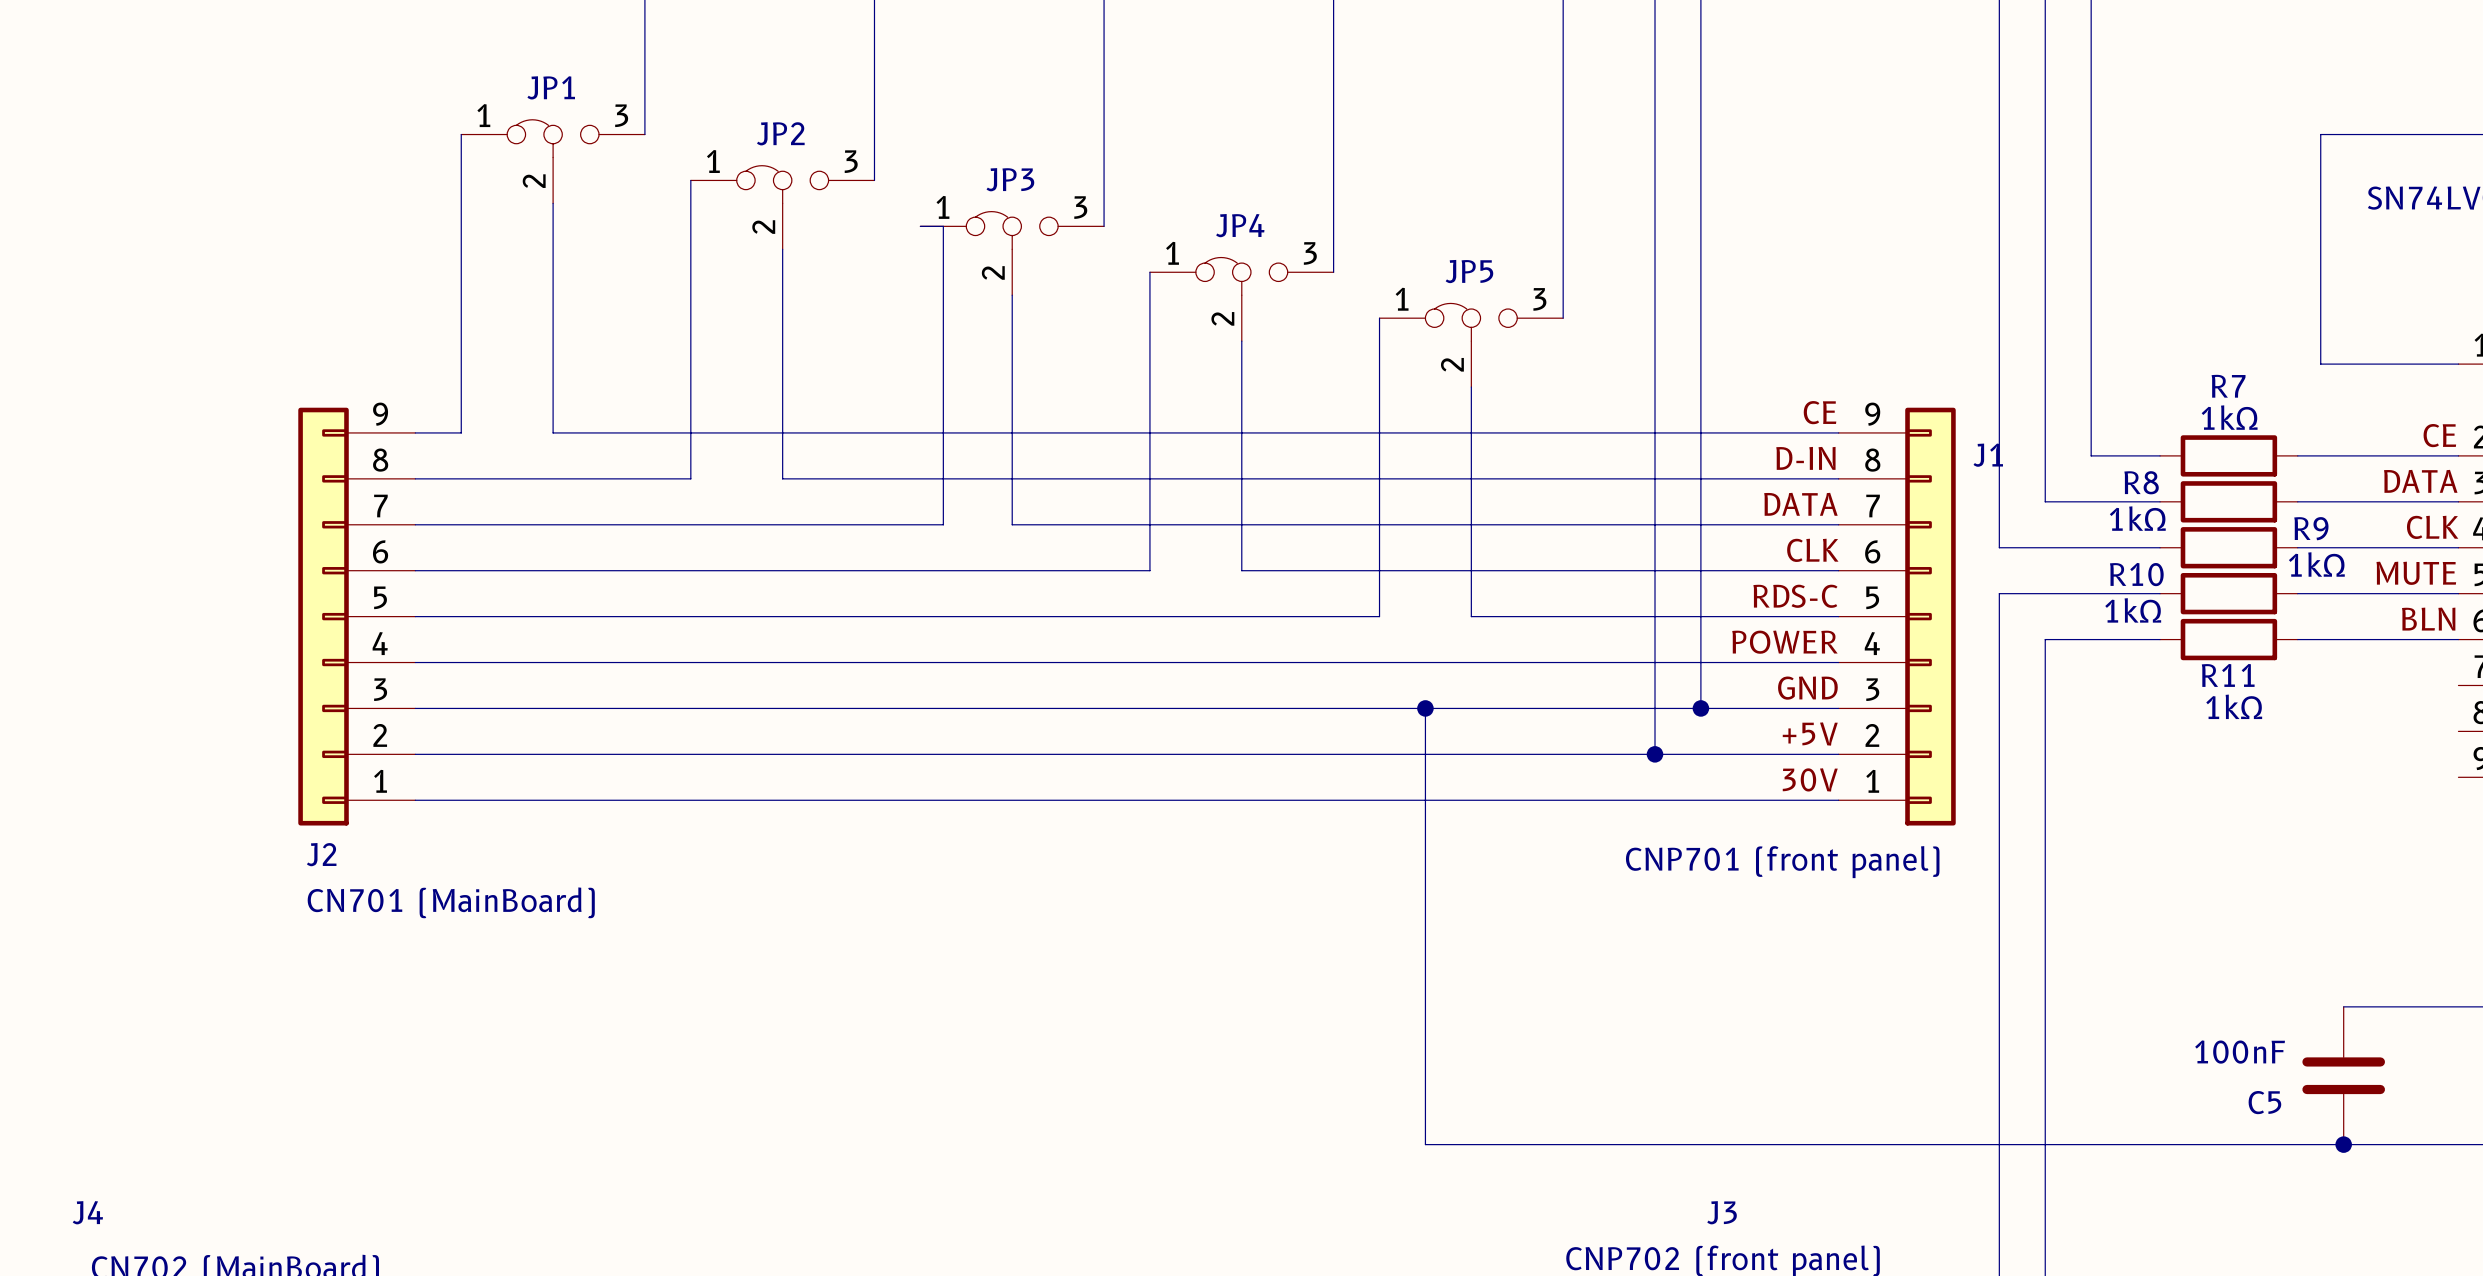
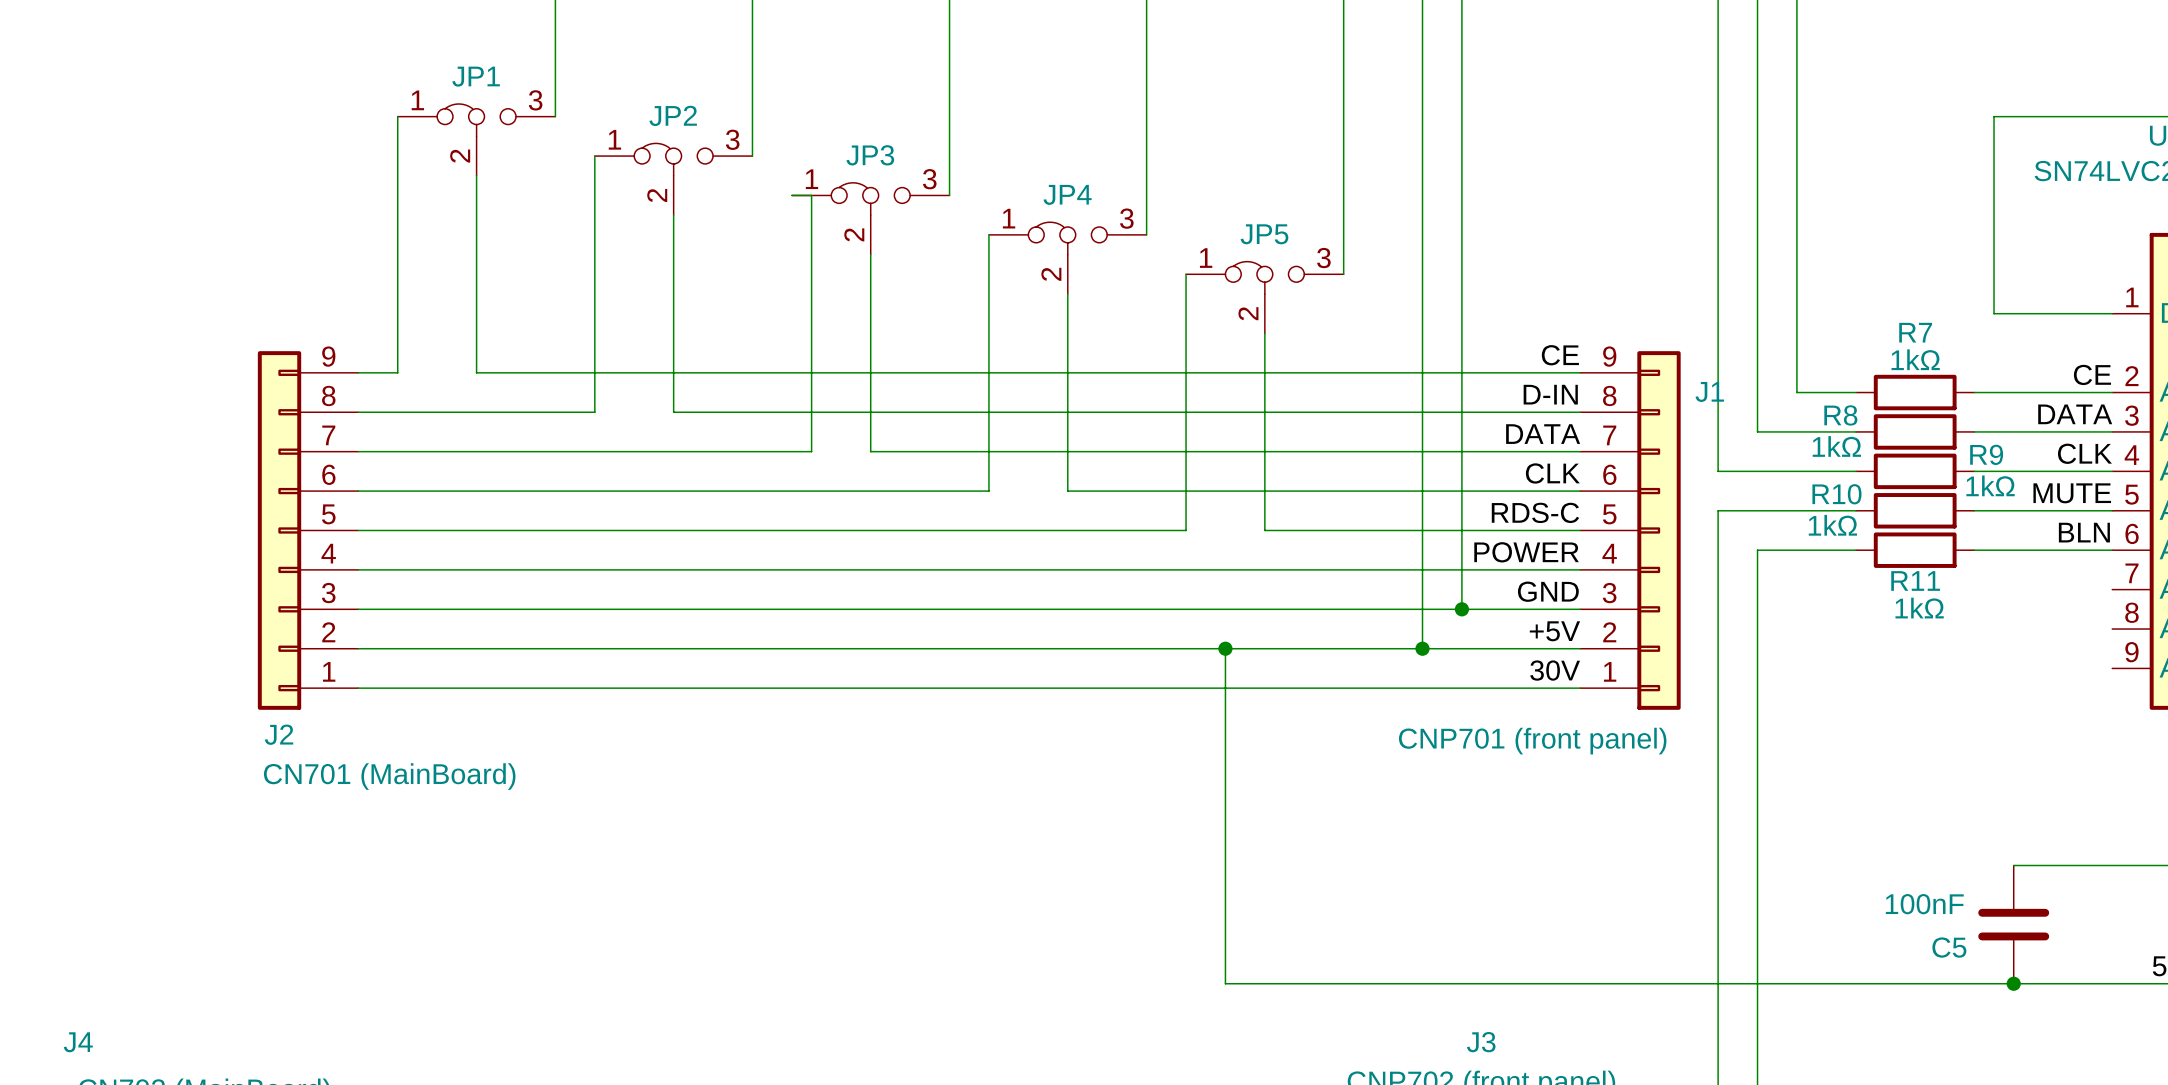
wire: (1425, 708) (1425, 754) -> none
junction position: (1425, 708) -> (1225, 648)

